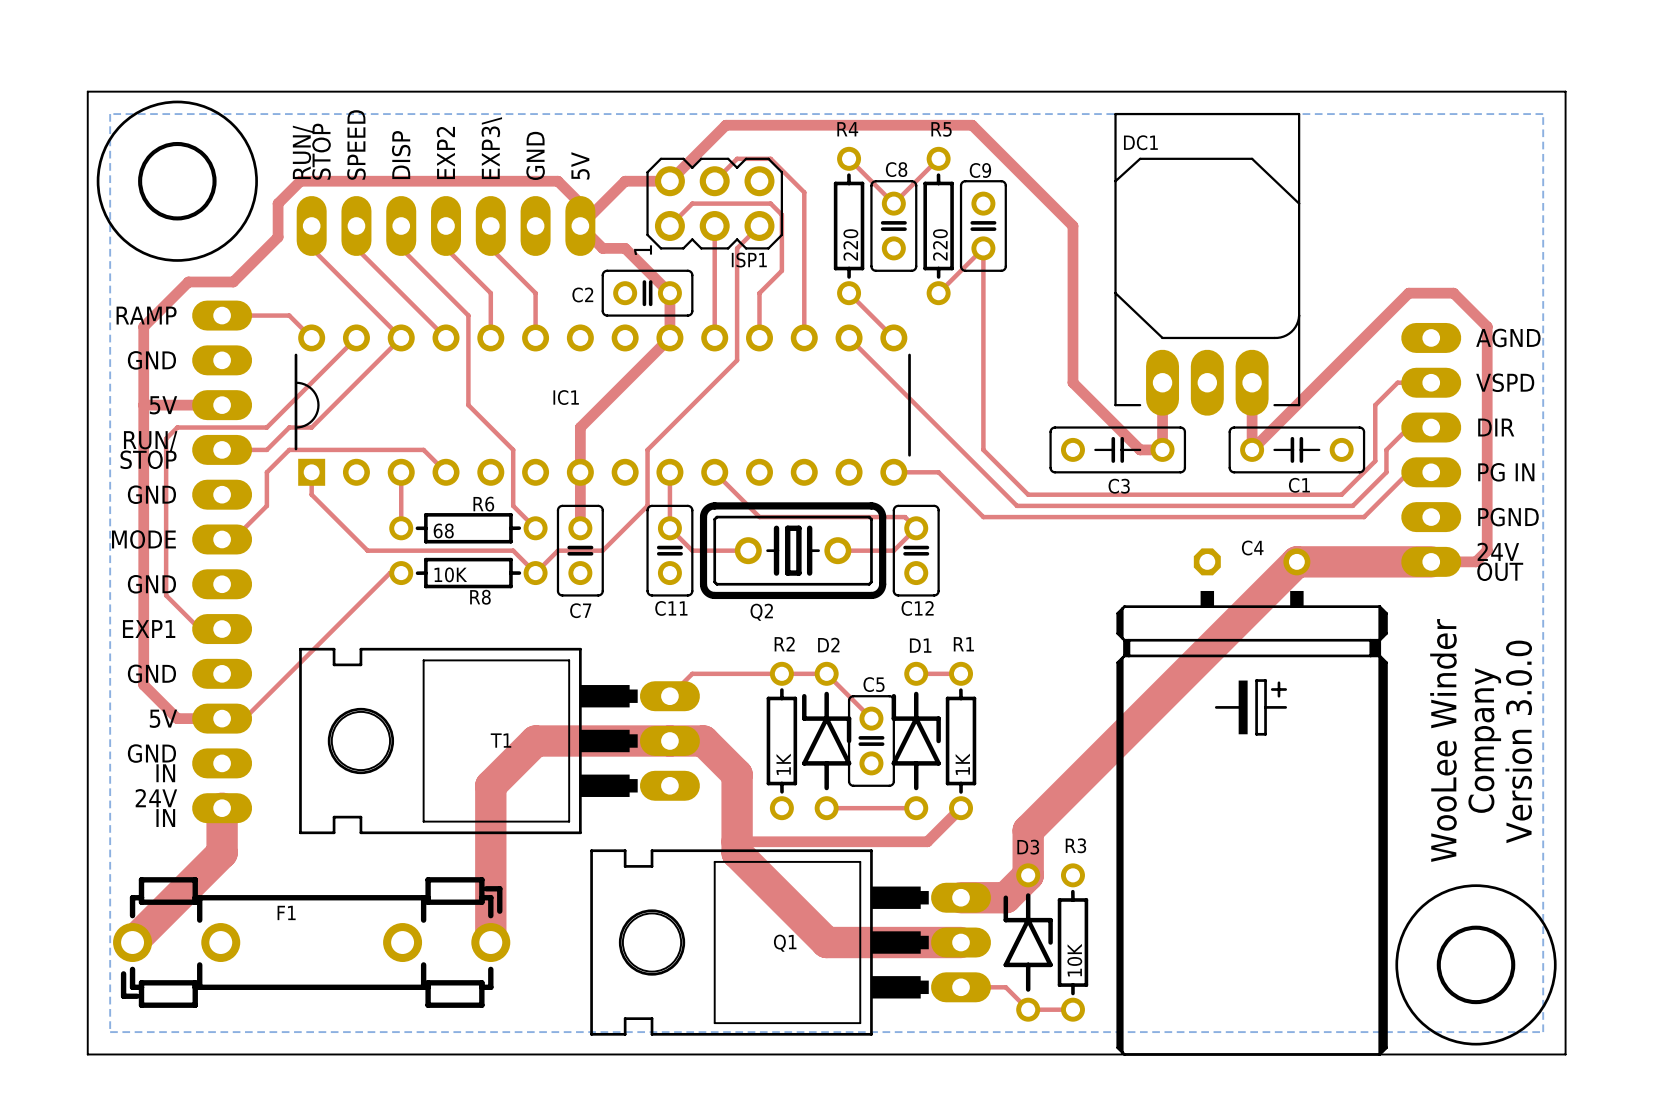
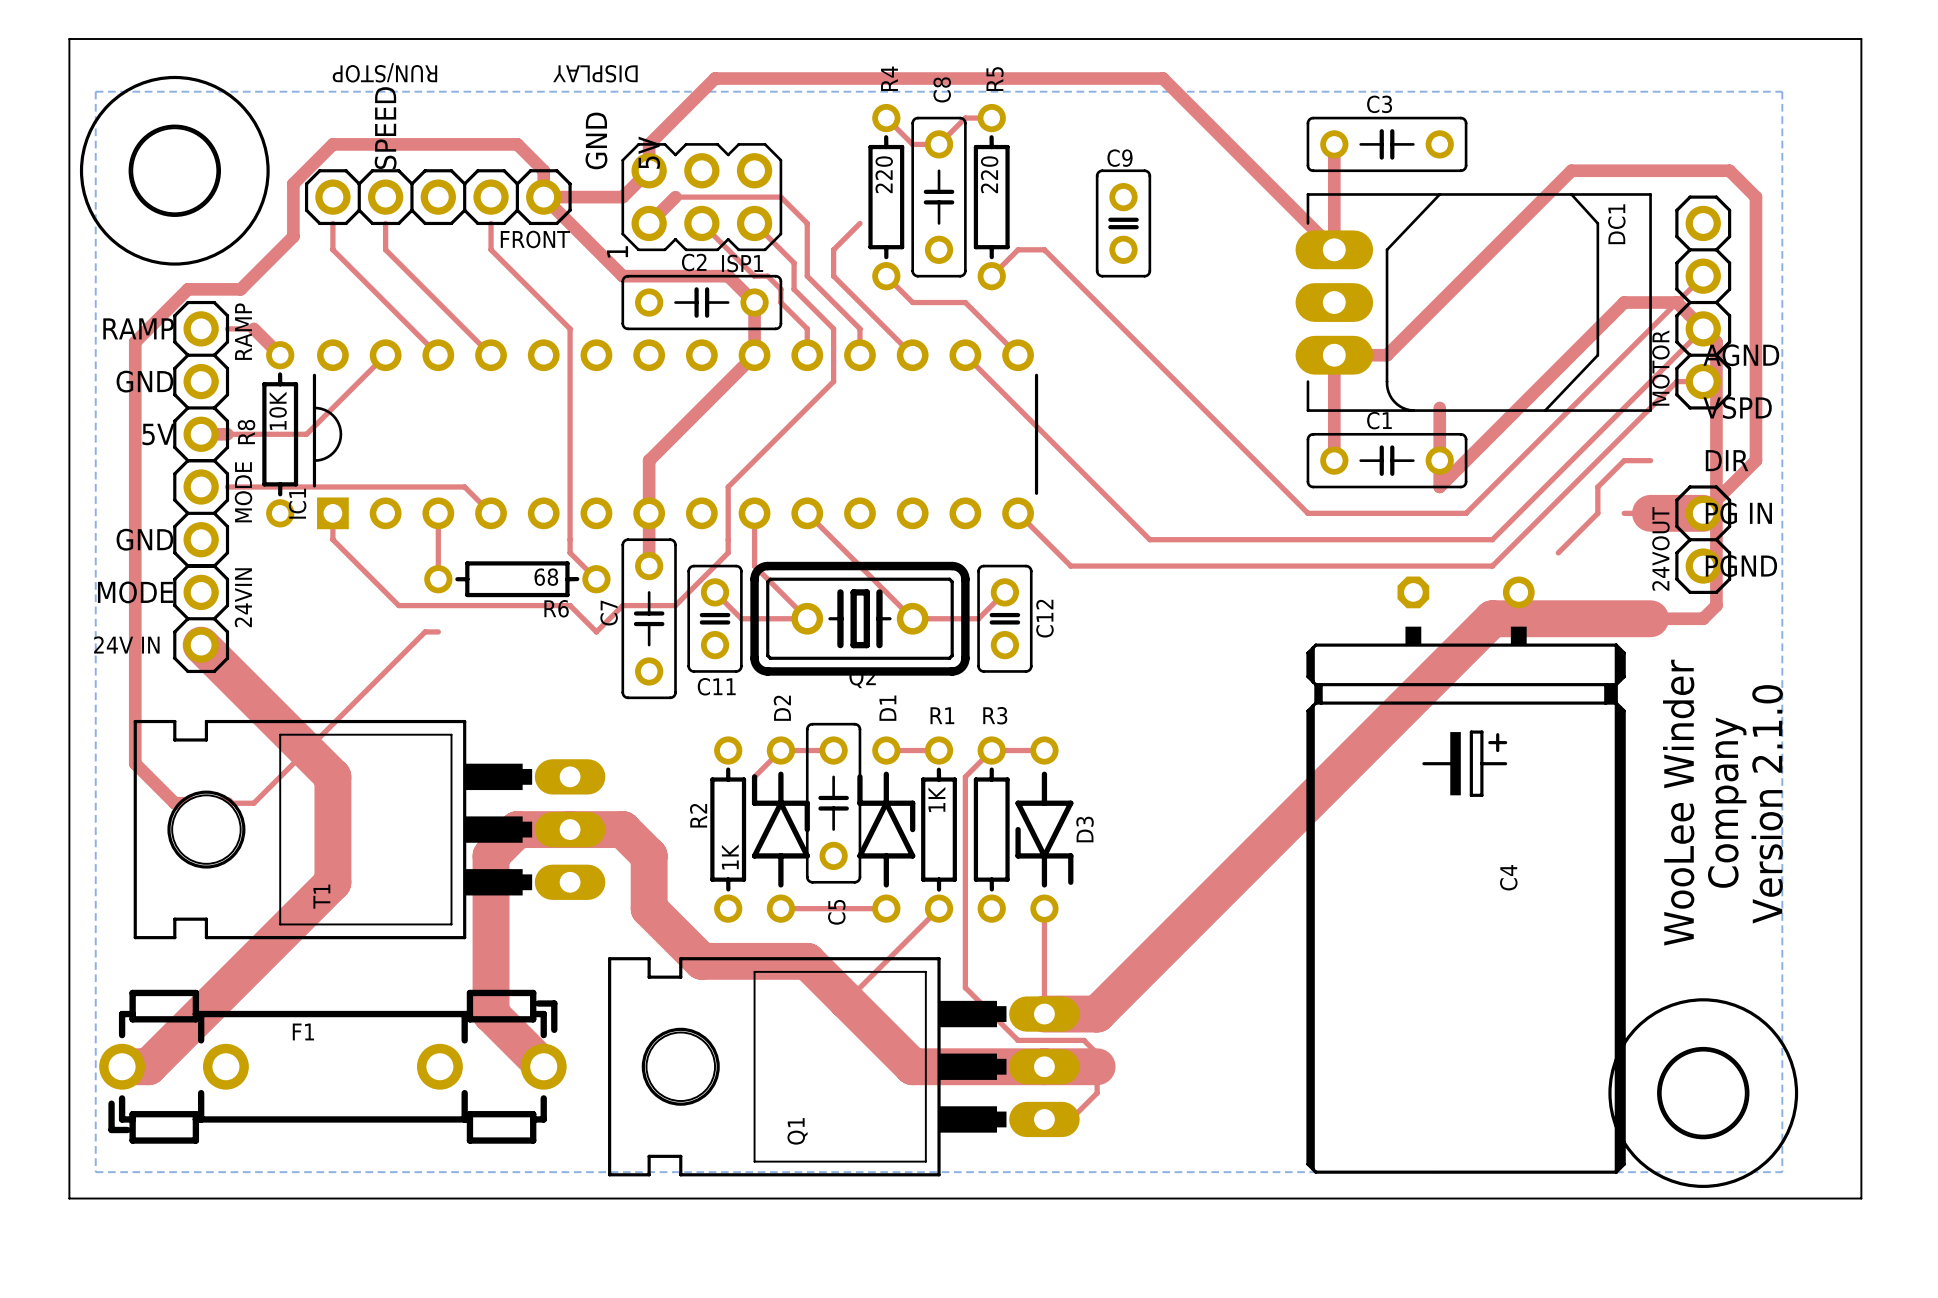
board edge: (87, 91) (1565, 91) (1565, 1054) -> (69, 65) (69, 39) (1861, 39) (1861, 1198) (1808, 1198)
text: none -> RUN/STOP (384, 72)
text: none -> DISPLAY (595, 73)
R4 name rotation: 0° (847, 129) -> 90° counterclockwise (889, 78)
R5 name rotation: 0° (941, 129) -> 90° counterclockwise (995, 79)
top track: none -> (886, 118) (912, 144) (939, 144) (965, 118) (991, 118)
text: EXP3\ (491, 148) -> none
text: STOP (321, 151) -> none
text: RUN/ (302, 152) -> none
text: EXP2 (445, 152) -> none
text: DISP (401, 155) -> none
top track: (849, 158) (893, 203) (938, 158) -> none
top track: none -> (1334, 144) (1334, 249) (1163, 78) (715, 78) (649, 144) (649, 170) (622, 197) (543, 197)
C8 footprint: [870, 180, 918, 272] -> [911, 116, 967, 278]
top track: (714, 181) (737, 158) (770, 158) (804, 192) (804, 337) -> none
top track: (278, 203) (300, 181) (557, 181) (580, 203) (580, 226) (602, 248) (625, 248) (647, 270) -> (293, 197) (293, 183) (332, 144) (517, 144) (543, 170) (543, 197)
FRONT: none -> (438, 197)
top track: none -> (543, 197) (622, 276) (728, 276)
top track: (602, 203) (625, 181) (669, 181) (725, 125) (972, 125) (1072, 226) (1072, 382) (1140, 449) (1162, 449) (1162, 427) -> (675, 197) (780, 197) (807, 223)
ISP1 position: (714, 203) -> (701, 197)
top track: (401, 226) (401, 248) (468, 315) (468, 405) (513, 449) -> (543, 302) (570, 328) (570, 486)
part: (446, 226) -> none
top track: (490, 226) (490, 248) (535, 293) (535, 337) -> none
top track: none -> (701, 223) (754, 276) (767, 276) (780, 289) (780, 302) (807, 328)
top track: (669, 226) (692, 203) (770, 203) (781, 214) (781, 270) (759, 293) (759, 315) -> (754, 223) (794, 262) (794, 289) (833, 328)
R4 position: (849, 226) -> (886, 197)
R5 position: (938, 226) -> (991, 197)
R4 value position: 220 (850, 244) -> 220 (884, 174)
R5 value position: 220 (940, 244) -> 220 (989, 174)
DC1 rotation: 0° (1207, 264) -> 90° clockwise (1473, 302)
C2 footprint: [601, 269, 694, 317] -> [621, 274, 783, 331]
top track: (714, 270) (714, 315) -> (807, 276) (859, 328)
top track: (737, 270) (737, 315) -> (833, 276) (912, 355)
top track: none -> (886, 276) (912, 302) (965, 302)
top track: none -> (991, 276) (1018, 249) (1044, 249) (1307, 513) (1466, 513) (1703, 276)
top track: (490, 293) (490, 337) -> none
top track: (938, 293) (983, 248) (983, 449) (1028, 494) -> (1149, 539) (1176, 539)
MOTOR: none -> (1703, 302)
C2 name position: C2 (582, 294) -> C2 (694, 262)
top track: (244, 315) (289, 315) (311, 337) -> (253, 328) (280, 355)
top track: (401, 337) (311, 427) (289, 427) (266, 449) -> none
RAMP: none -> (201, 381)
part: (222, 360) -> none
top track: none -> (1334, 407) (1334, 355) (1387, 355) (1571, 170) (1729, 170) (1755, 197) (1755, 460) (1703, 513) (1650, 513)
top track: (1431, 382) (1397, 382) (1375, 405) (1375, 461) (1341, 494) (1296, 494) -> (1703, 328) (1492, 539)
IC1 name rotation: 0° (566, 397) -> 90° counterclockwise (297, 503)
IC1 name position: IC1 (566, 397) -> IC1 (297, 503)
top track: (143, 405) (199, 405) -> none
top track: (289, 405) (266, 427) (177, 427) (166, 438) (166, 595) (199, 629) (222, 629) -> (306, 434) (227, 434)
part: (1431, 405) -> none
text: RUN/ (150, 441) -> none
top track: (289, 449) (266, 472) (266, 505) (233, 539) (222, 539) -> (306, 486) (280, 486)
C3 position: (1117, 449) -> (1387, 144)
C1 position: (1296, 449) -> (1387, 460)
text: STOP (148, 459) -> none
MODE: none -> (201, 513)
part: (222, 472) -> none
top track: (893, 472) (938, 472) (983, 517) -> (1018, 513) (1070, 566) (1123, 566)
top track: (1408, 472) (1364, 517) (1296, 517) -> (1703, 381) (1676, 381) (1492, 566)
C1 name position: C1 (1299, 485) -> C1 (1379, 420)
C3 name position: C3 (1119, 486) -> C3 (1379, 104)
top track: (1005, 494) (1016, 505) (1352, 505) -> none
24VOUT: none -> (1703, 539)
R6 name position: R6 (483, 504) -> R6 (556, 608)
C7 footprint: [556, 504, 604, 597] -> [621, 538, 677, 700]
top track: (669, 517) (669, 528) (692, 550) (748, 550) -> (754, 566) (807, 618) (741, 618) (715, 592)
top track: (759, 517) (905, 517) (916, 528) (893, 550) (837, 550) -> (859, 566) (912, 618) (978, 618) (1004, 592)
R6 value position: 68 (443, 530) -> 68 (546, 577)
part: (1431, 539) -> none
C4 name rotation: 0° (1252, 548) -> 90° counterclockwise (1508, 877)
C4 name position: C4 (1252, 548) -> C4 (1508, 877)
C11 position: (669, 550) -> (715, 618)
Q2 position: (793, 550) -> (859, 618)
C12 position: (916, 550) -> (1004, 618)
text: 24V (1498, 551) -> none
24VIN: none -> (201, 618)
part: (222, 561) -> none
text: OUT (1500, 571) -> none
R8 rotation: 0° (468, 573) -> 90° clockwise (280, 434)
R8 position: (468, 573) -> (280, 434)
text: GND (151, 584) -> 24V IN (126, 644)
C12 name rotation: 0° (917, 608) -> 90° counterclockwise (1044, 618)
C7 name position: C7 (580, 610) -> C7 (609, 613)
text: EXP1 (149, 629) -> none
R2 name rotation: 0° (784, 644) -> 90° counterclockwise (698, 815)
R2 name position: R2 (784, 644) -> R2 (698, 815)
D2 name rotation: 0° (828, 645) -> 90° counterclockwise (782, 708)
D1 name rotation: 0° (920, 645) -> 90° counterclockwise (887, 708)
text: GND (151, 673) -> none
part: (222, 673) -> none
top track: (737, 673) (781, 673) -> none
top track: (826, 673) (871, 718) -> none
top track: (916, 673) (961, 673) -> (1044, 750) (991, 750) (965, 776) (965, 987) (1018, 1040) (1083, 1040) (1097, 1053) (1097, 1093) (1070, 1119) (1044, 1119)
C5 name position: C5 (874, 684) -> C5 (836, 912)
C5 footprint: [847, 695, 895, 787] -> [805, 722, 862, 884]
text: 5V (163, 718) -> none
T1 name rotation: 0° (500, 740) -> 90° counterclockwise (321, 896)
T1 name position: T1 (500, 740) -> T1 (321, 896)
text position: WooLee Winder (1443, 740) -> WooLee Winder (1678, 802)
text position: Company (1484, 740) -> Company (1727, 802)
T1 position: (499, 741) -> (369, 829)
top track: (535, 741) (490, 785) (490, 942) -> (596, 829) (517, 829) (491, 855) (491, 1014) (543, 1066)
top track: (557, 741) (703, 741) (737, 774) (737, 852) (826, 942) -> (622, 829) (649, 855) (649, 908) (701, 961) (807, 961) (912, 1066) (939, 1066)
R2 position: (781, 741) -> (728, 829)
D2 position: (826, 741) -> (780, 829)
D1 position: (916, 741) -> (886, 829)
R1 position: (961, 741) -> (939, 829)
text: Version 3.0.0 (1518, 741) -> Version 2.1.0 (1767, 804)
text: GND (151, 753) -> none
R1 value position: 1K (962, 764) -> 1K (936, 799)
text: IN (165, 773) -> none
part: (222, 785) -> none
text: 24V (156, 798) -> none
C4 position: (1252, 802) -> (1466, 875)
top track: (222, 808) (222, 852) (132, 942) -> (201, 645) (332, 776) (332, 882) (148, 1066) (122, 1066)
top track: none -> (780, 908) (886, 908)
top track: (826, 808) (916, 808) -> (939, 908) (846, 1000)
top track: (961, 808) (927, 841) (737, 841) -> none
text: IN (165, 818) -> none
top track: (1028, 830) (1028, 875) (1005, 897) (961, 897) -> (1176, 934) (1097, 1014) (1044, 1014) (1044, 908)
D3 name position: D3 (1028, 847) -> D3 (1085, 829)
Q1 position: (790, 942) -> (843, 1066)
D3 rotation: 0° (1028, 942) -> 180° (1044, 829)
D3 position: (1028, 942) -> (1044, 829)
R3 position: (1072, 942) -> (991, 829)
Q1 name rotation: 0° (785, 943) -> 90° counterclockwise (797, 1131)
Q1 name position: Q1 (785, 943) -> Q1 (797, 1131)
R3 value: 10K (1074, 960) -> none
top track: (961, 987) (1005, 987) (1028, 1009) (1072, 1009) -> none

